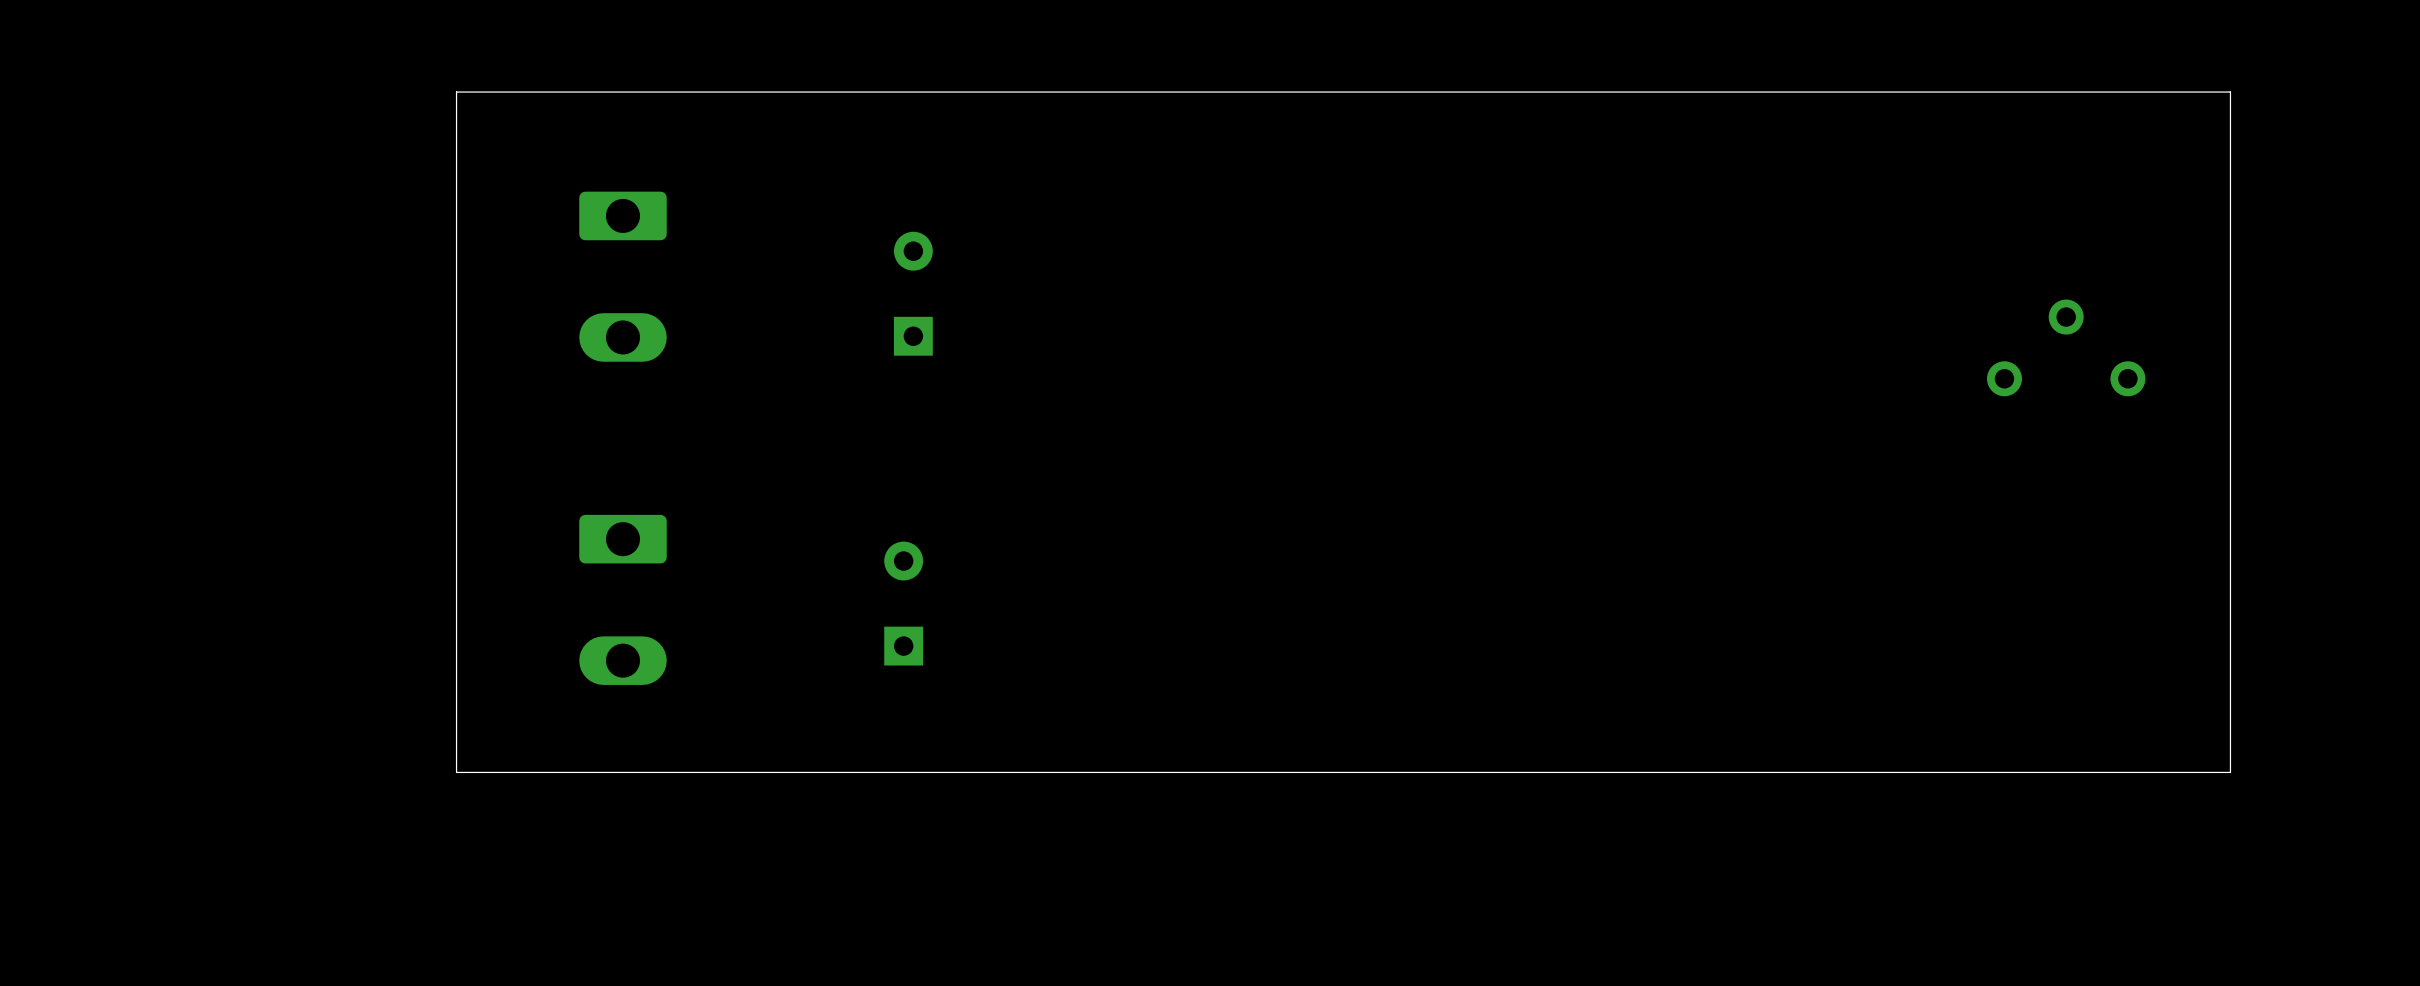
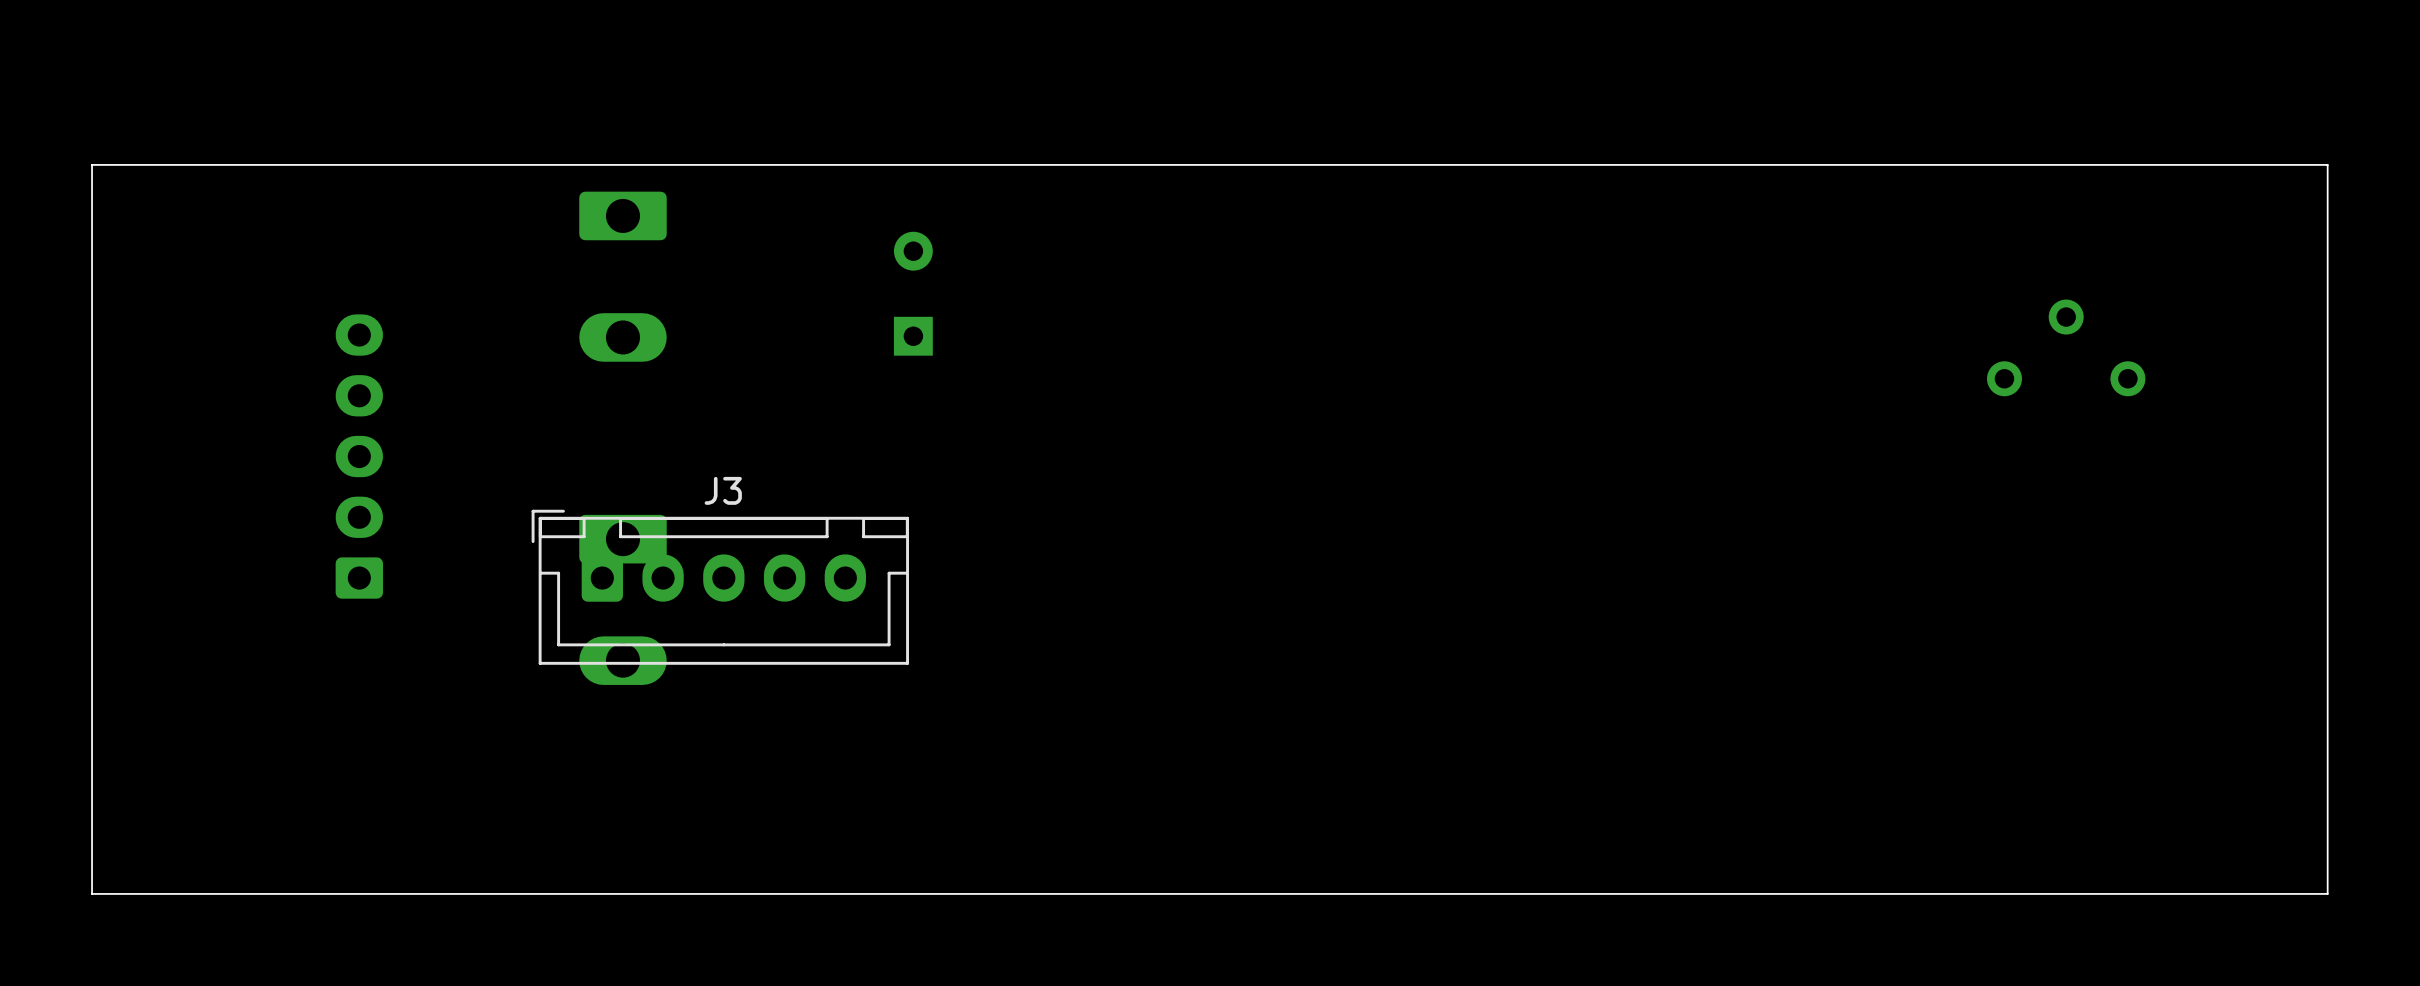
board edge: (2230, 92) (456, 92) (456, 772) (2230, 772) (2230, 92) -> (2327, 164) (2327, 893) (92, 893) (92, 164) (2327, 164)
part: none -> (359, 456)
J3: none -> (720, 587)
part: (903, 603) -> none

